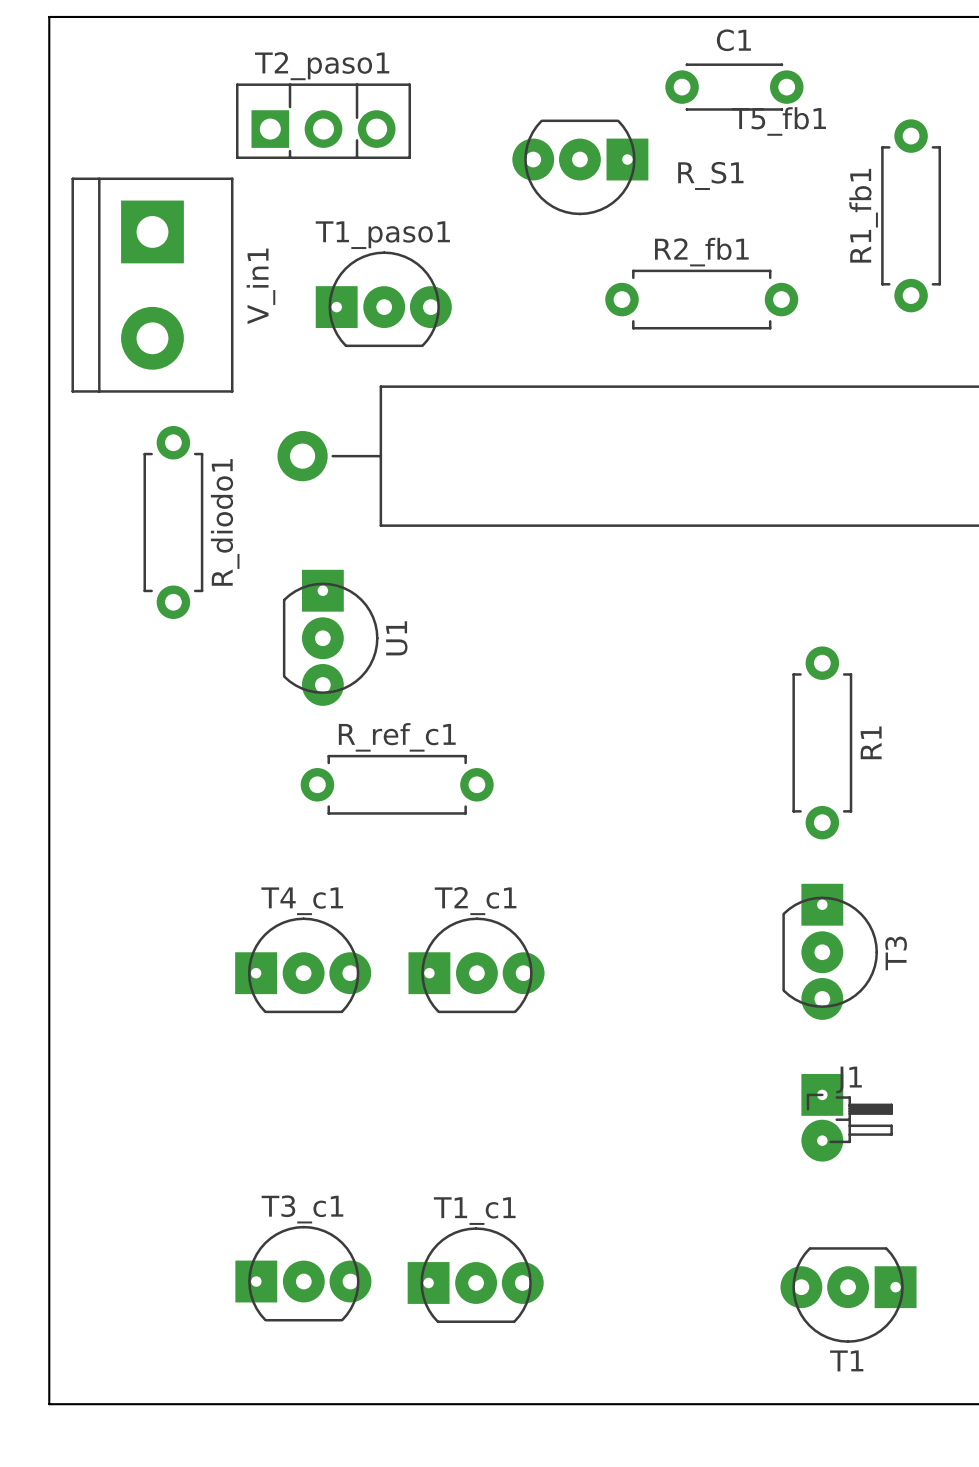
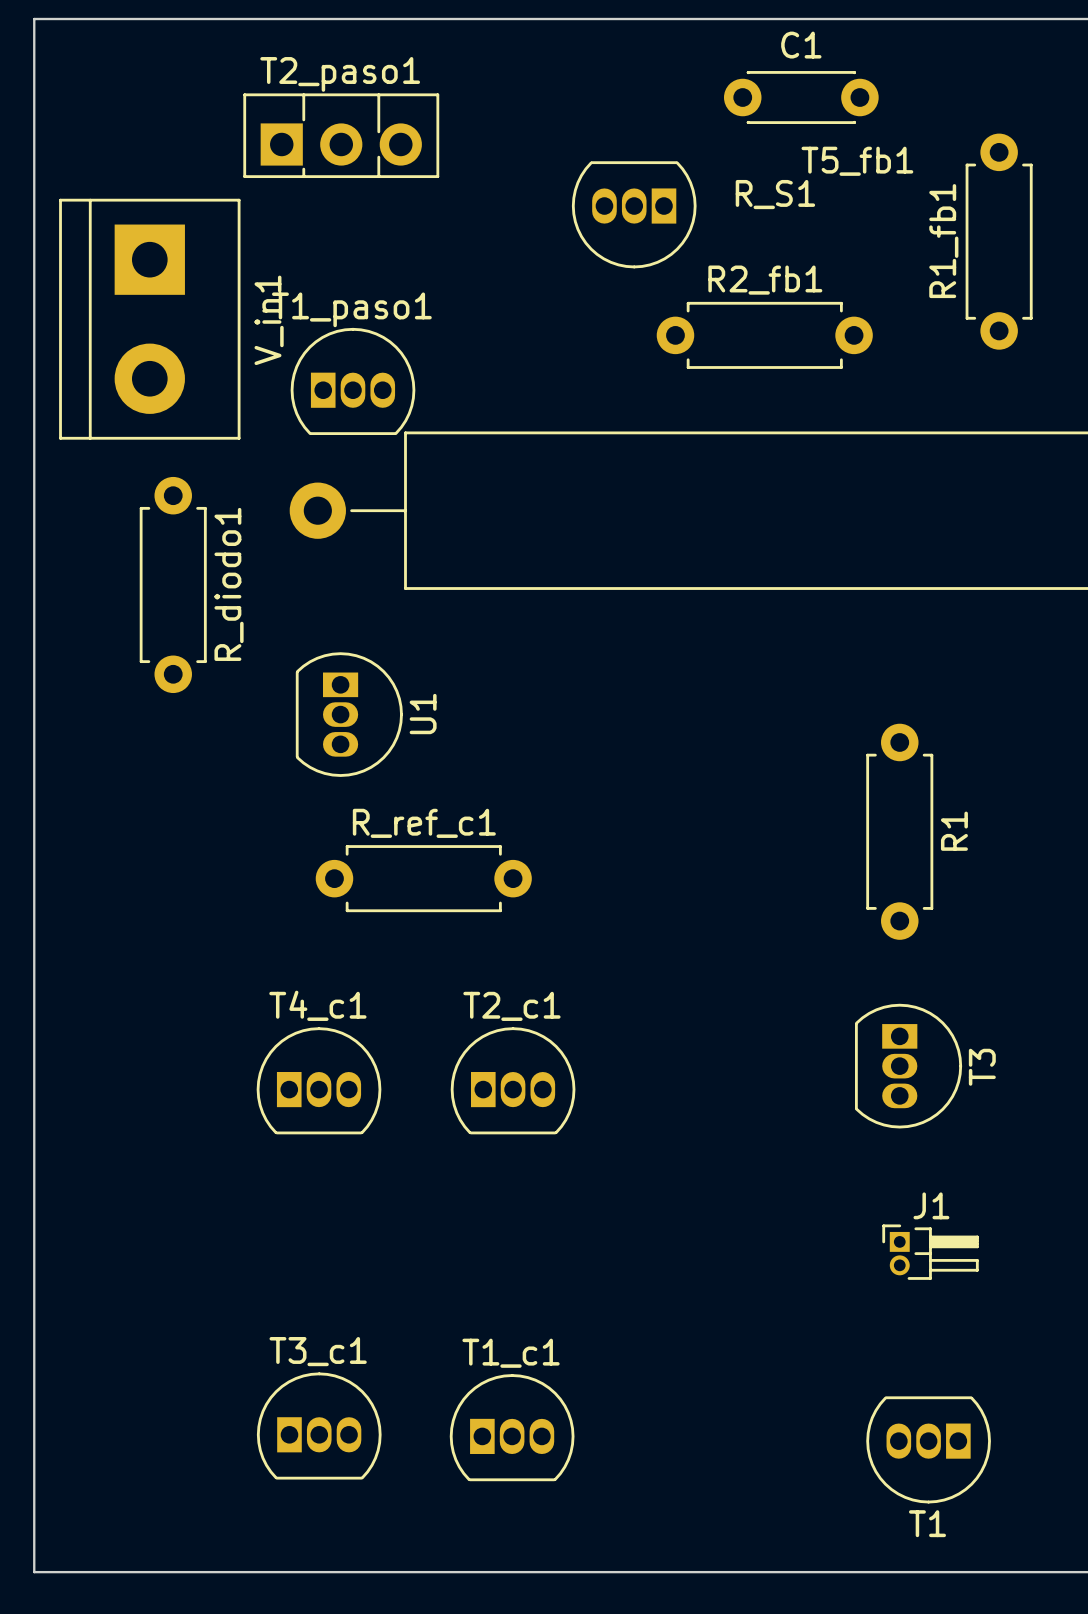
T5_fb1 footprint: [512, 119, 649, 216] -> [571, 161, 697, 269]
T1_paso1 footprint: [315, 251, 452, 348] -> [290, 327, 416, 435]
U1 footprint: [282, 569, 379, 706] -> [295, 652, 403, 777]
T3 footprint: [782, 883, 879, 1020] -> [855, 1003, 963, 1129]
T4_c1 footprint: [235, 917, 372, 1014] -> [256, 1027, 382, 1135]
T2_c1 footprint: [408, 917, 545, 1014] -> [450, 1027, 576, 1135]
J1 footprint: [801, 1073, 893, 1162] -> [882, 1224, 979, 1280]
T3_c1 footprint: [235, 1225, 372, 1322] -> [256, 1372, 382, 1480]
T1_c1 footprint: [407, 1227, 544, 1323] -> [449, 1374, 575, 1482]
T1 footprint: [780, 1247, 917, 1343] -> [866, 1396, 991, 1504]

